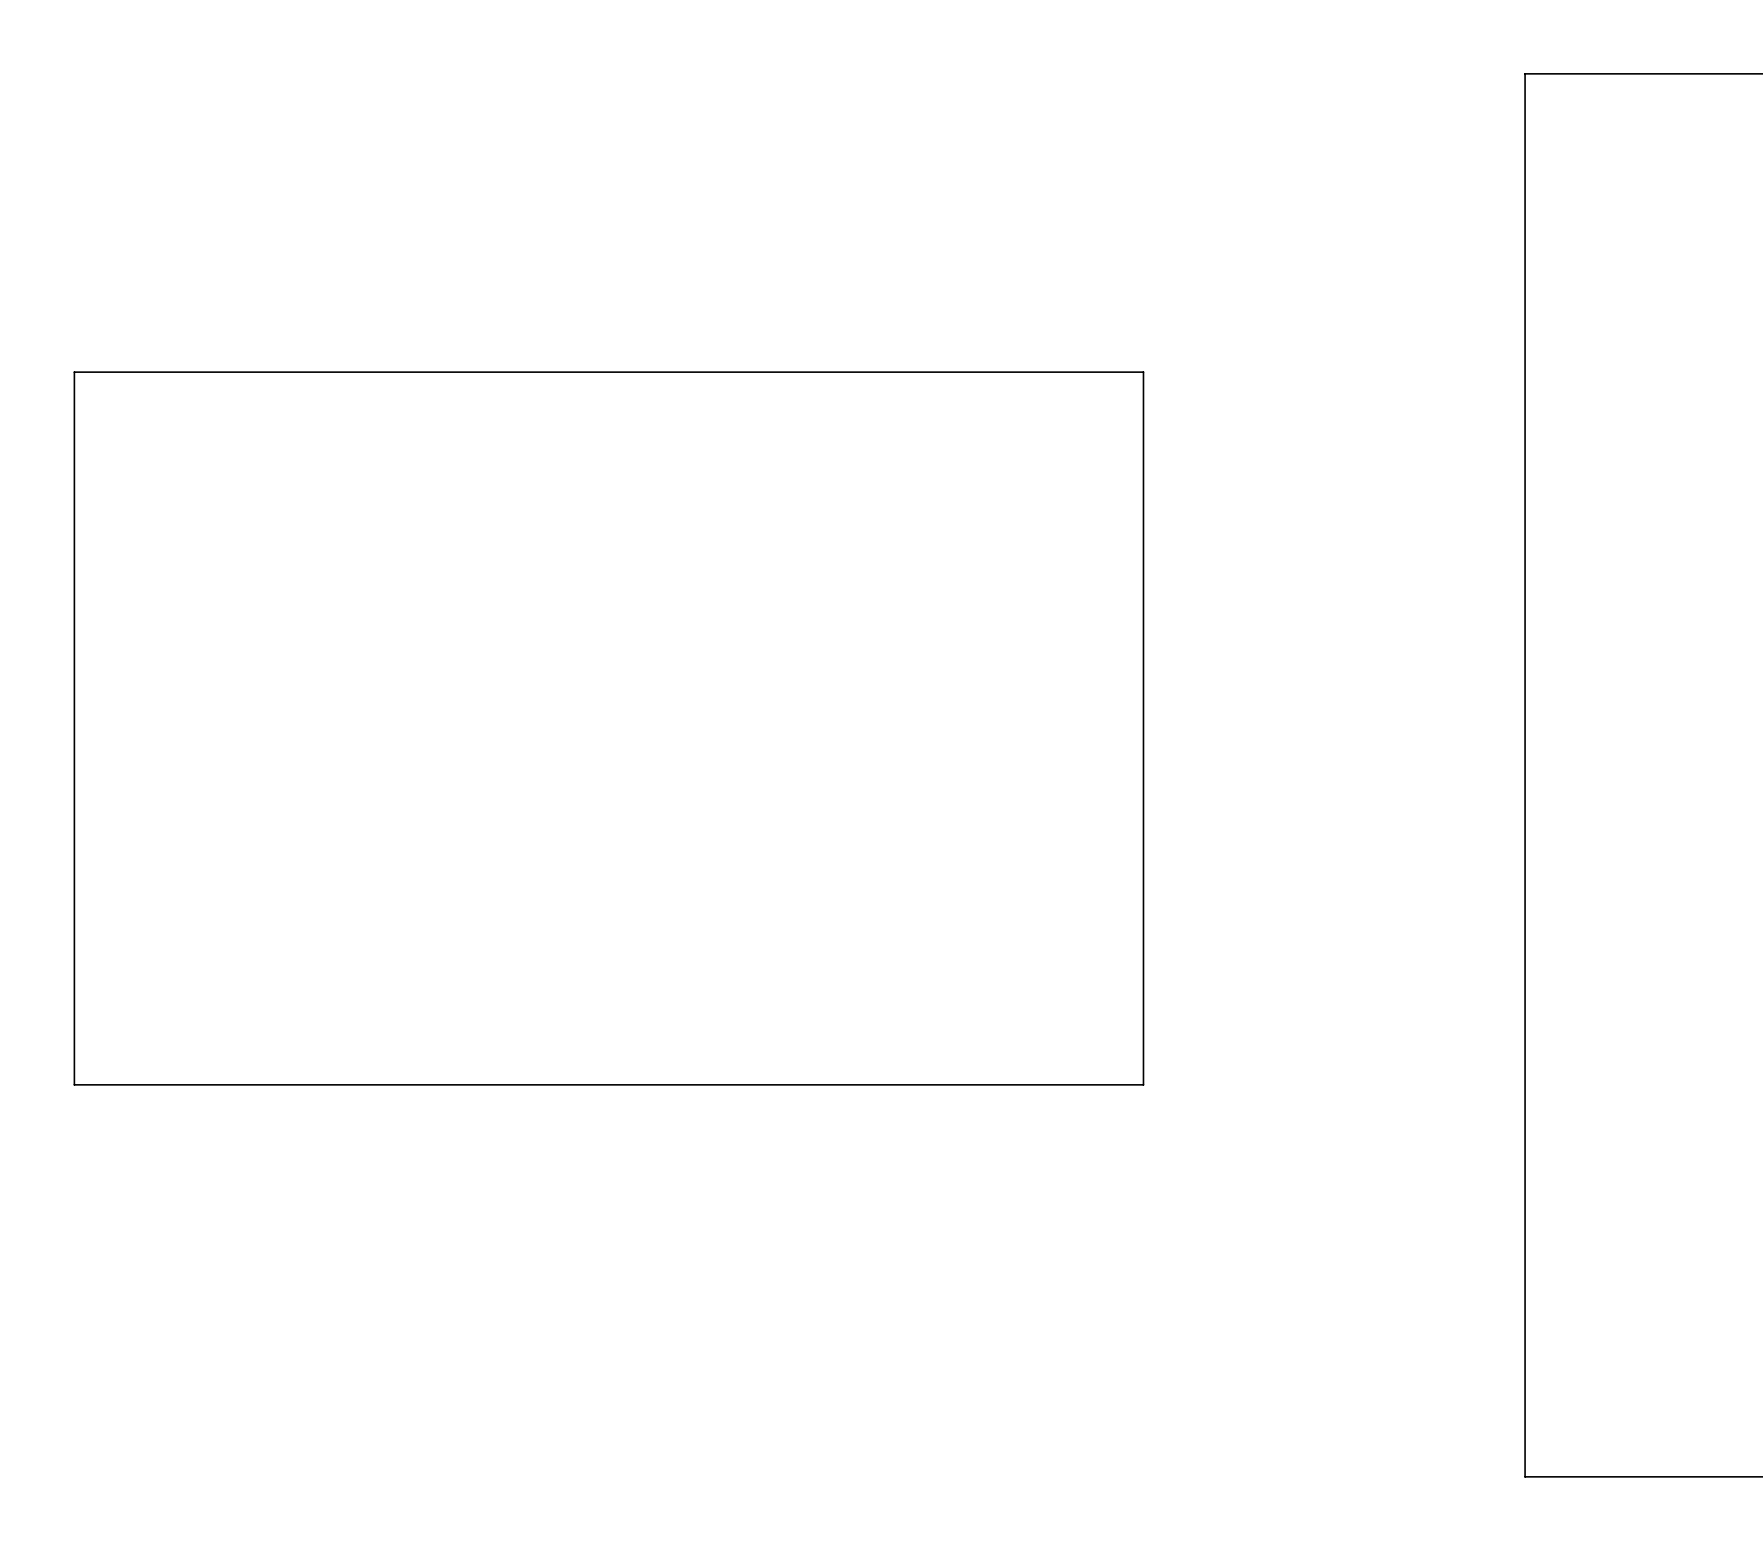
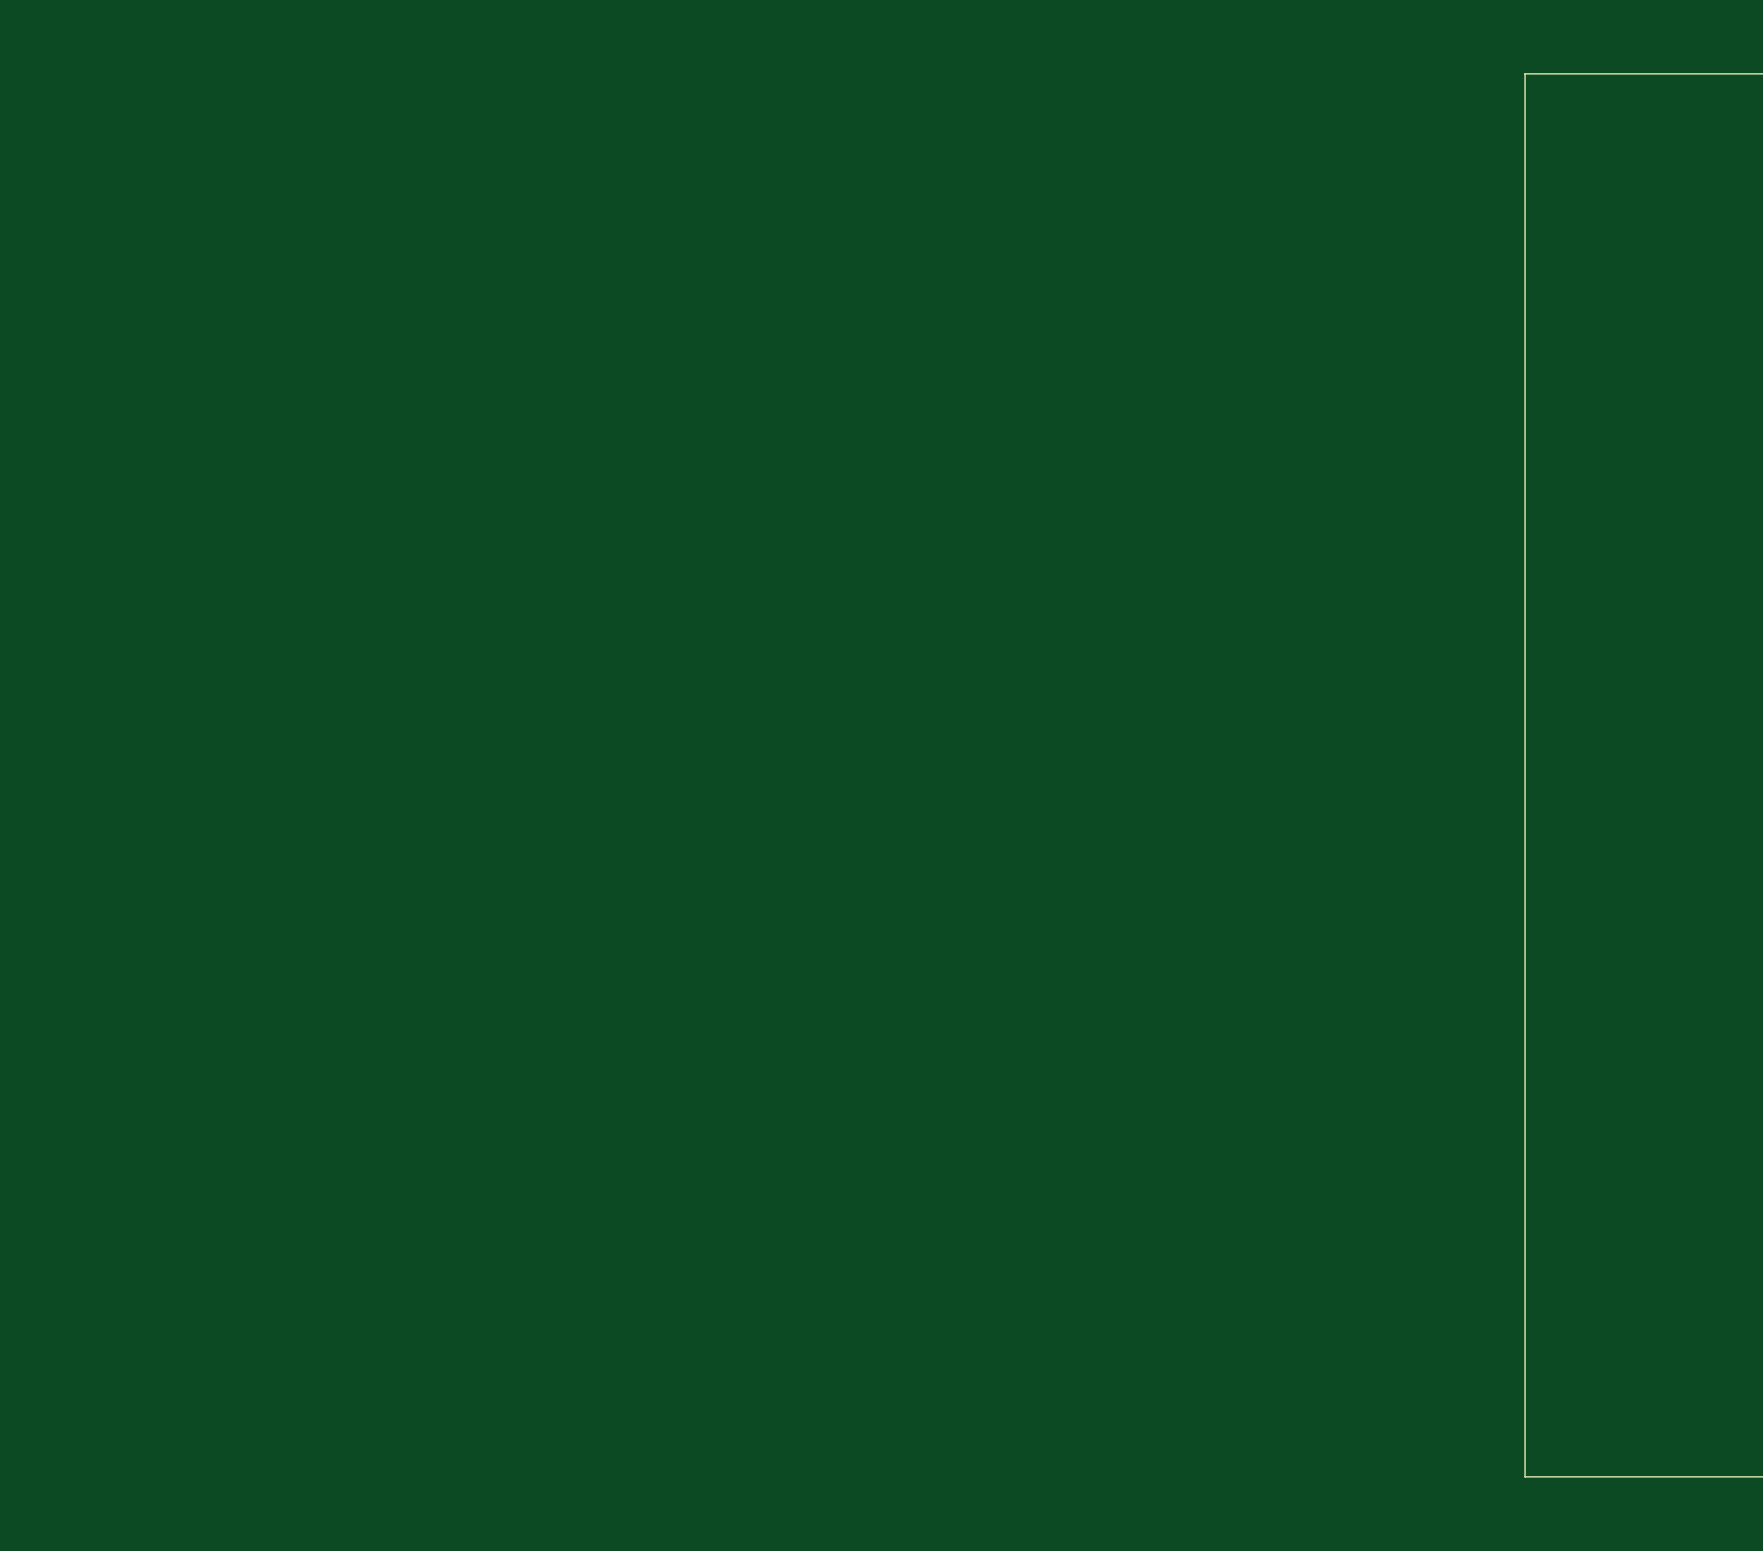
board edge: (1143, 372) (74, 372) (74, 1084) (1143, 1084) (1143, 372) -> none

